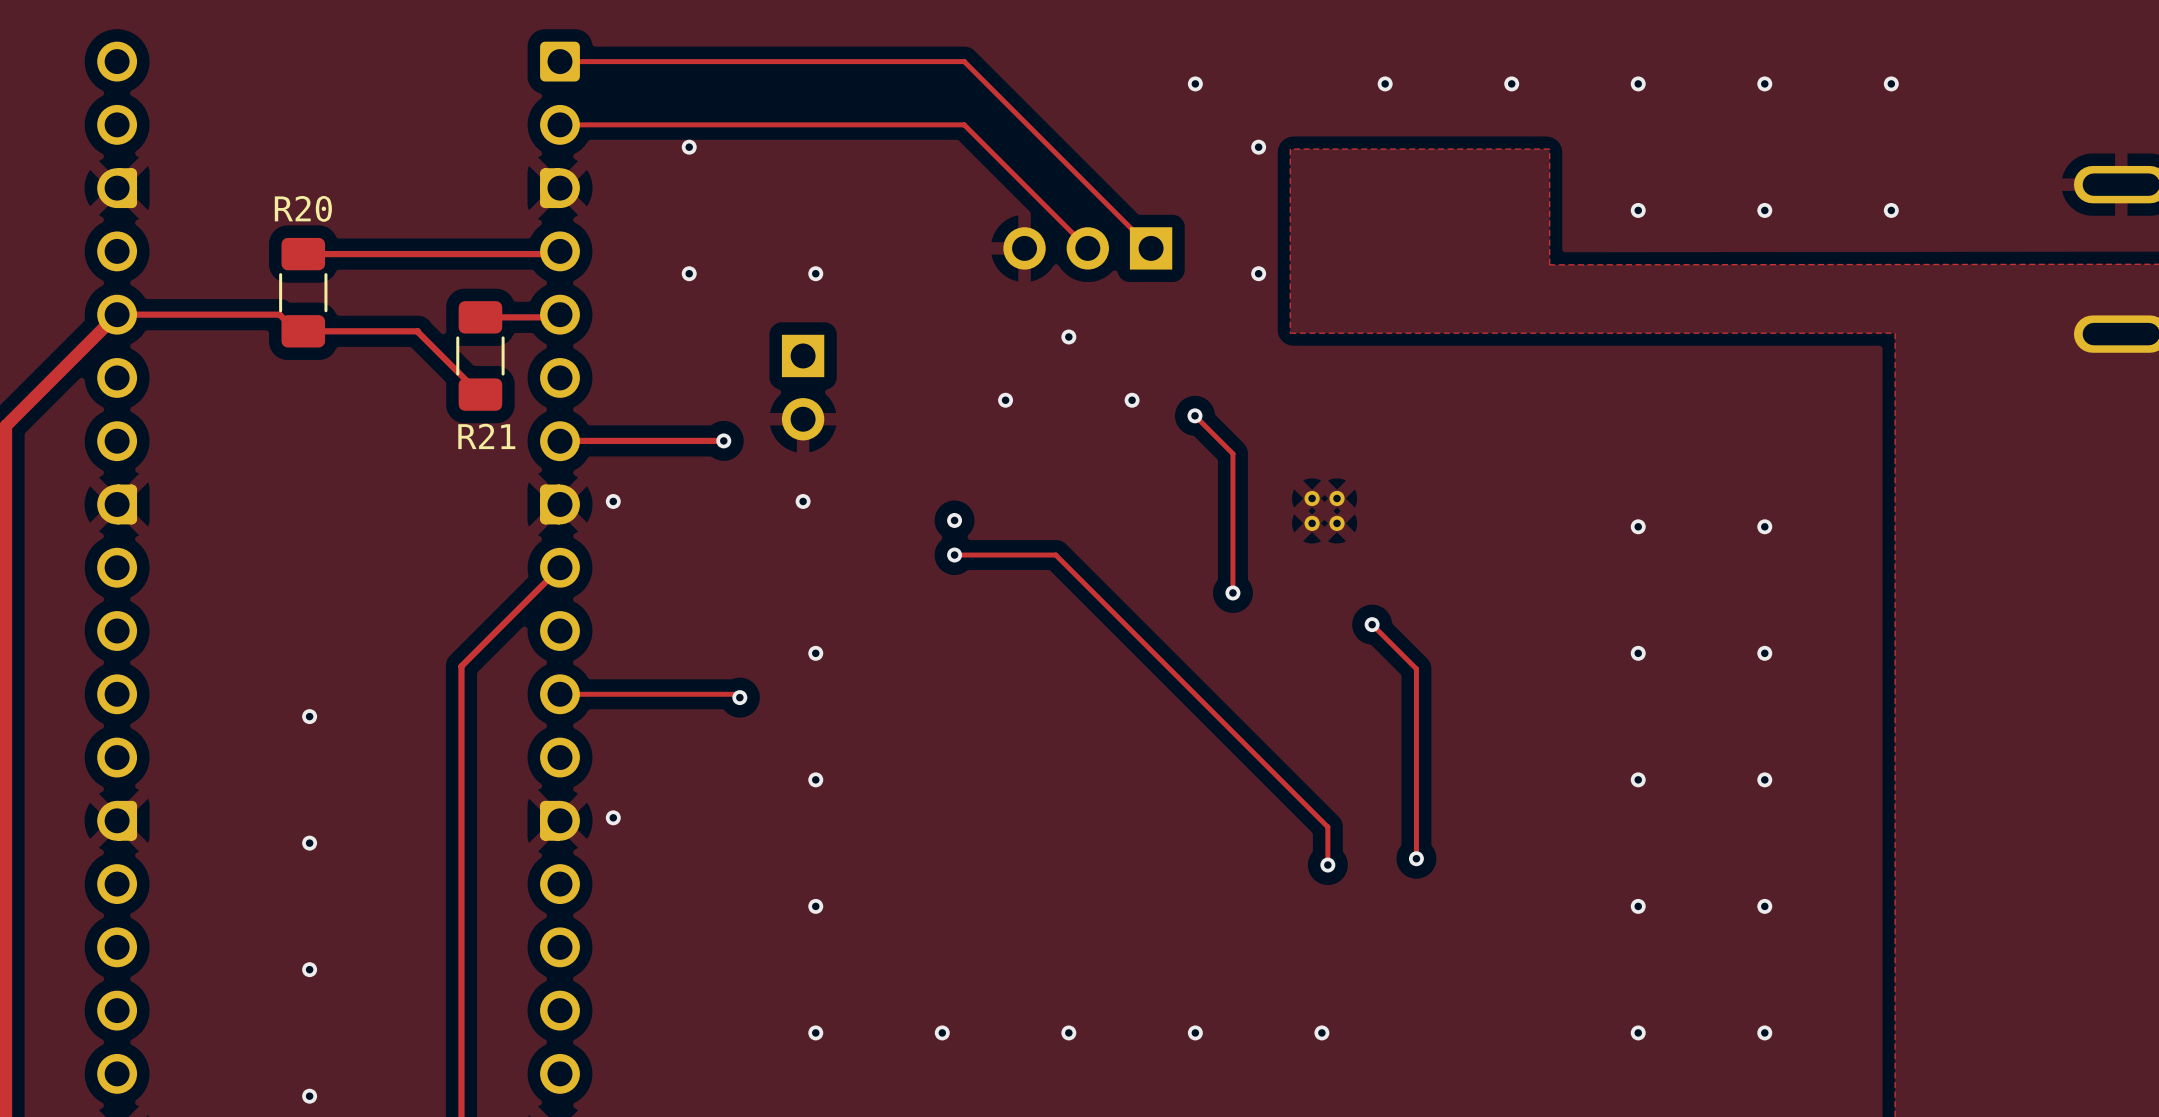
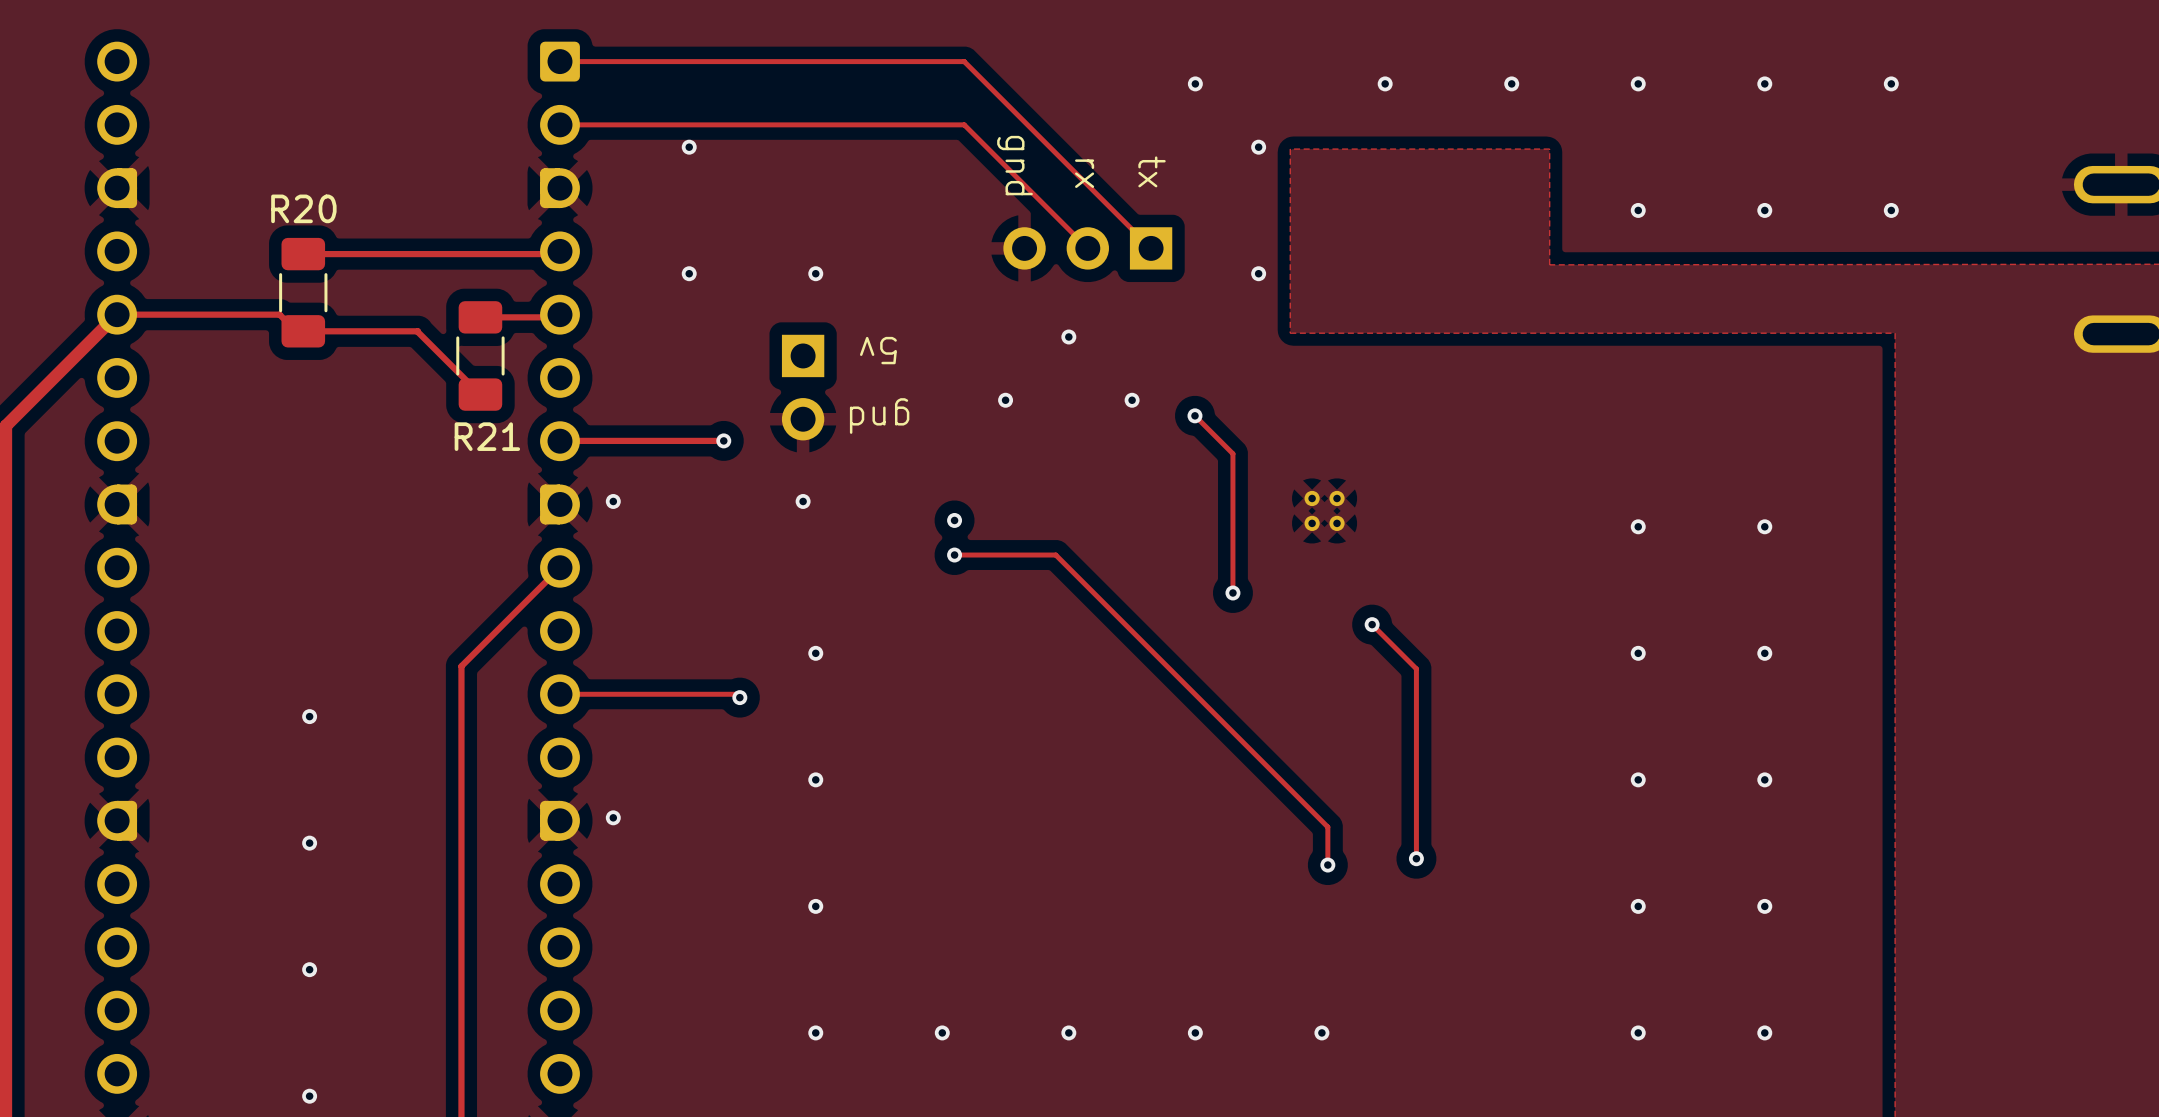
text: none -> gnd (1015, 165)
text: none -> tx (1152, 171)
text: none -> rx (1084, 173)
text: none -> 5v (878, 350)
text: none -> gnd (879, 416)

